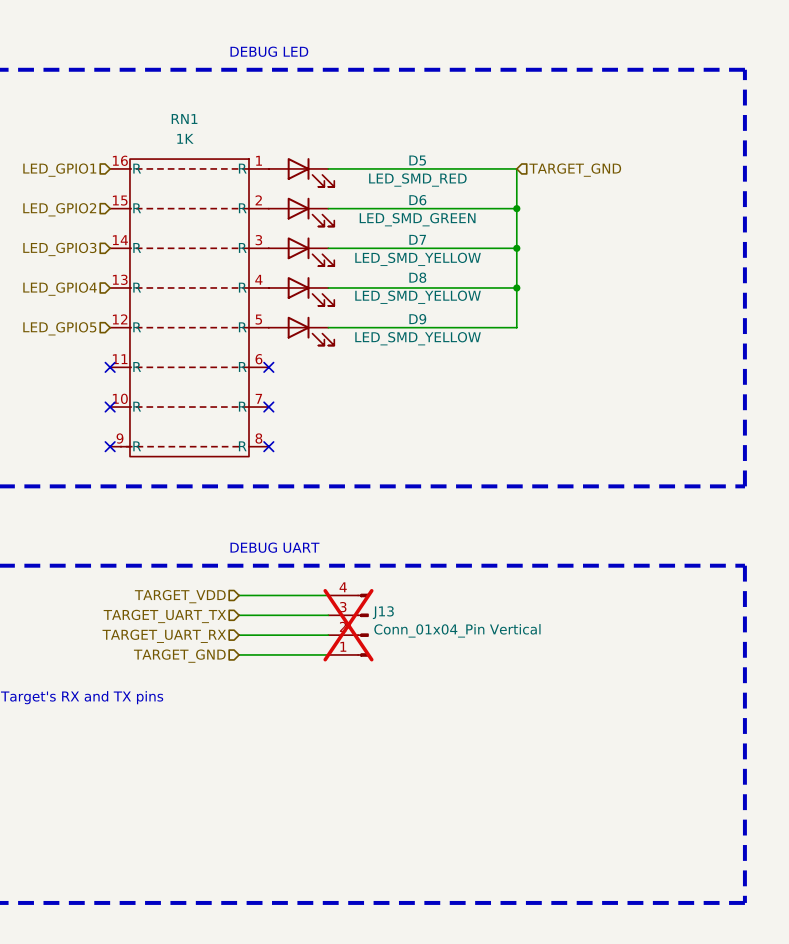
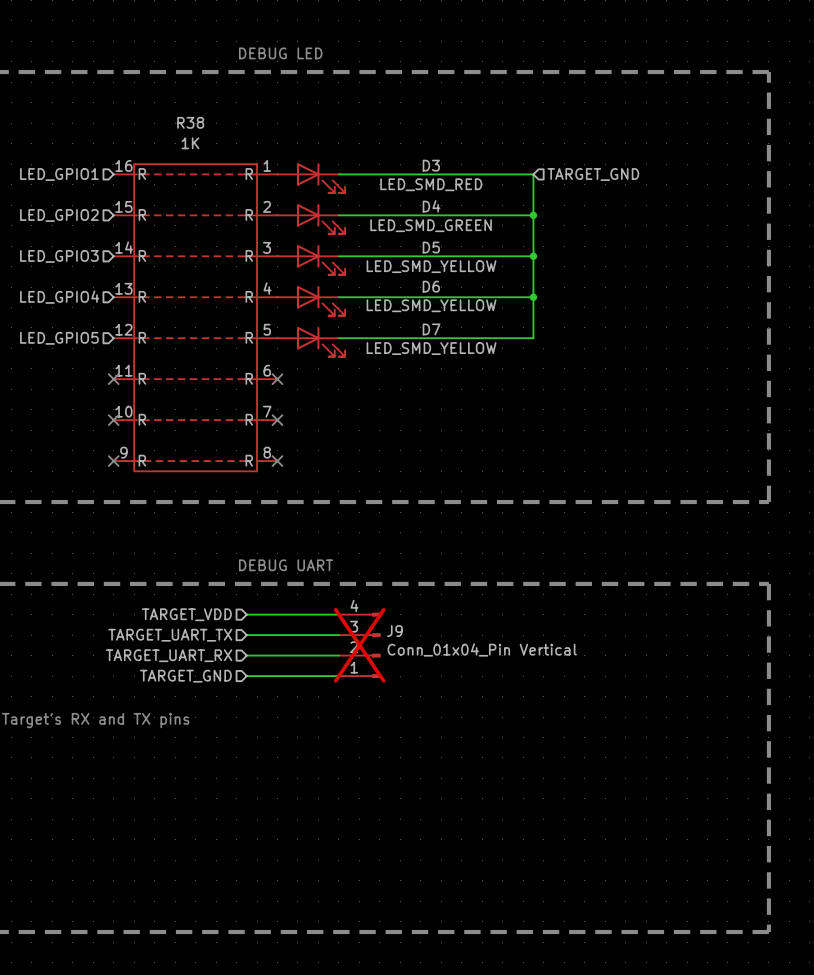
RN1 name: RN1 (184, 119) -> R38 (190, 122)
D5 name: D5 (417, 160) -> D3 (431, 165)
D6 name: D6 (417, 200) -> D4 (431, 206)
D7 name: D7 (417, 239) -> D5 (431, 247)
D8 name: D8 (417, 277) -> D6 (431, 286)
D9 name: D9 (417, 319) -> D7 (431, 329)
J13 name: J13 (383, 612) -> J9 (394, 631)

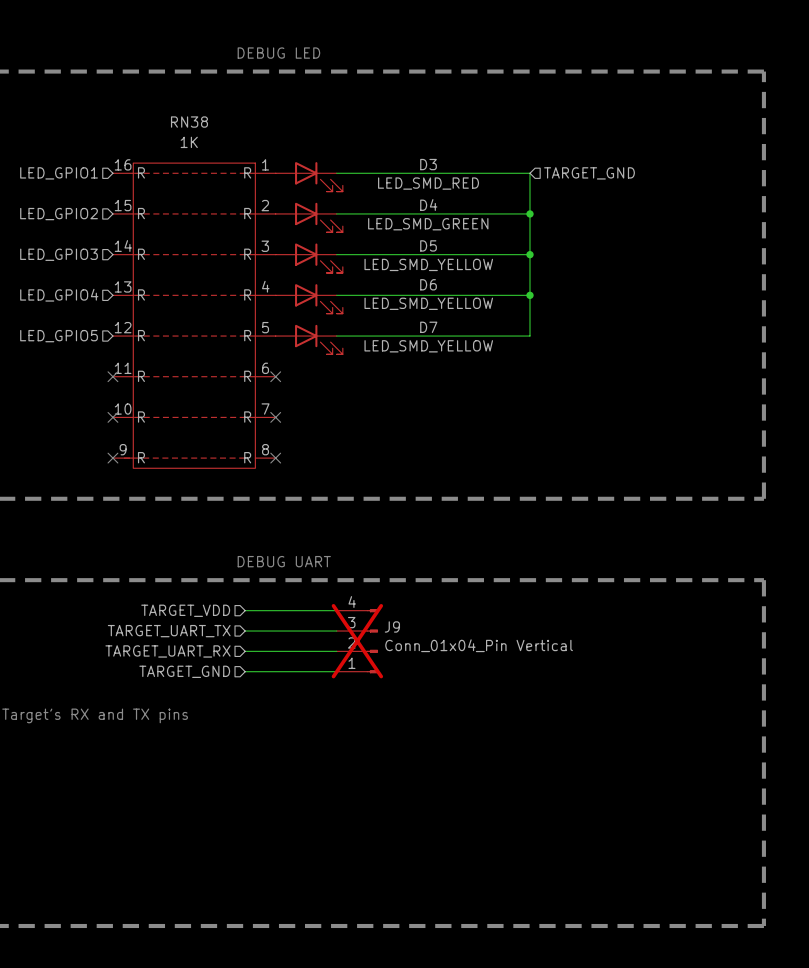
R38 name: R38 (190, 122) -> RN38 (189, 122)

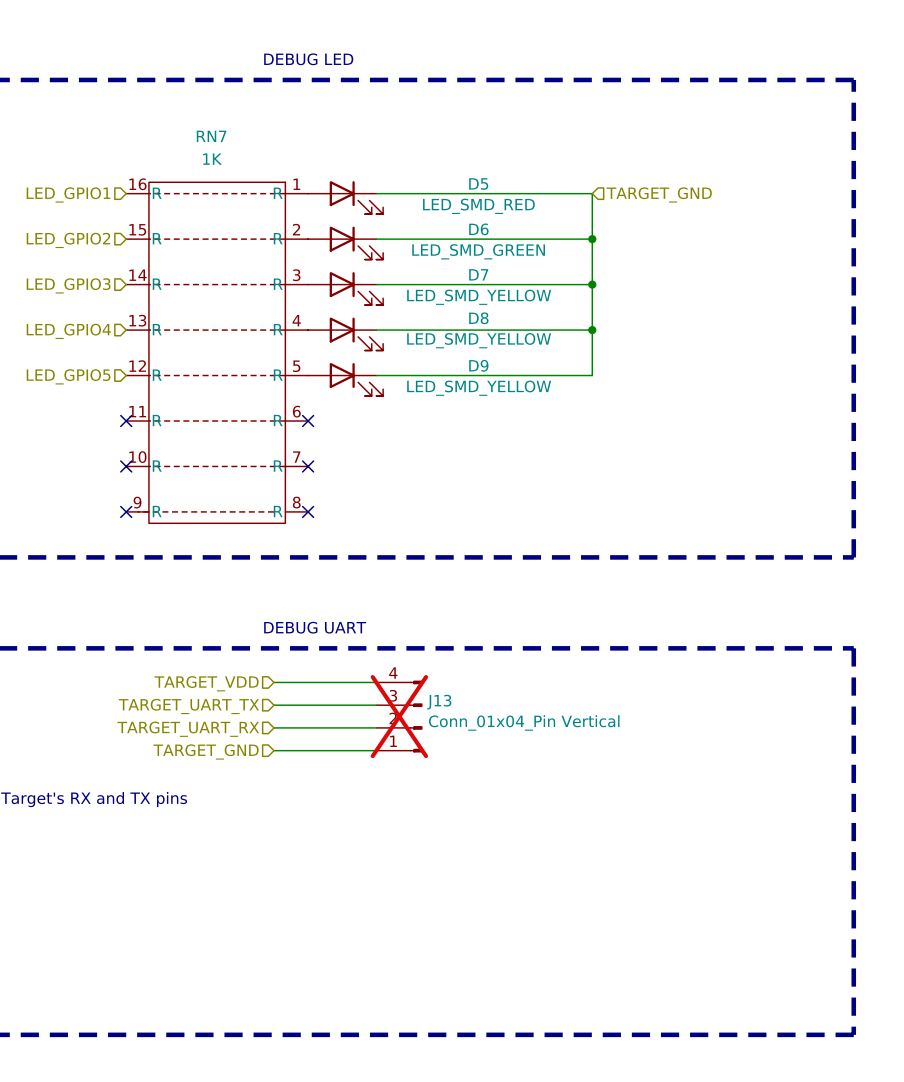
RN38 name: RN38 (189, 122) -> RN7 (211, 136)
D3 name: D3 (428, 164) -> D5 (478, 184)
D4 name: D4 (428, 205) -> D6 (478, 229)
D5 name: D5 (428, 245) -> D7 (478, 274)
D6 name: D6 (428, 284) -> D8 (478, 318)
D7 name: D7 (428, 327) -> D9 (478, 365)
J9 name: J9 (392, 626) -> J13 (439, 702)

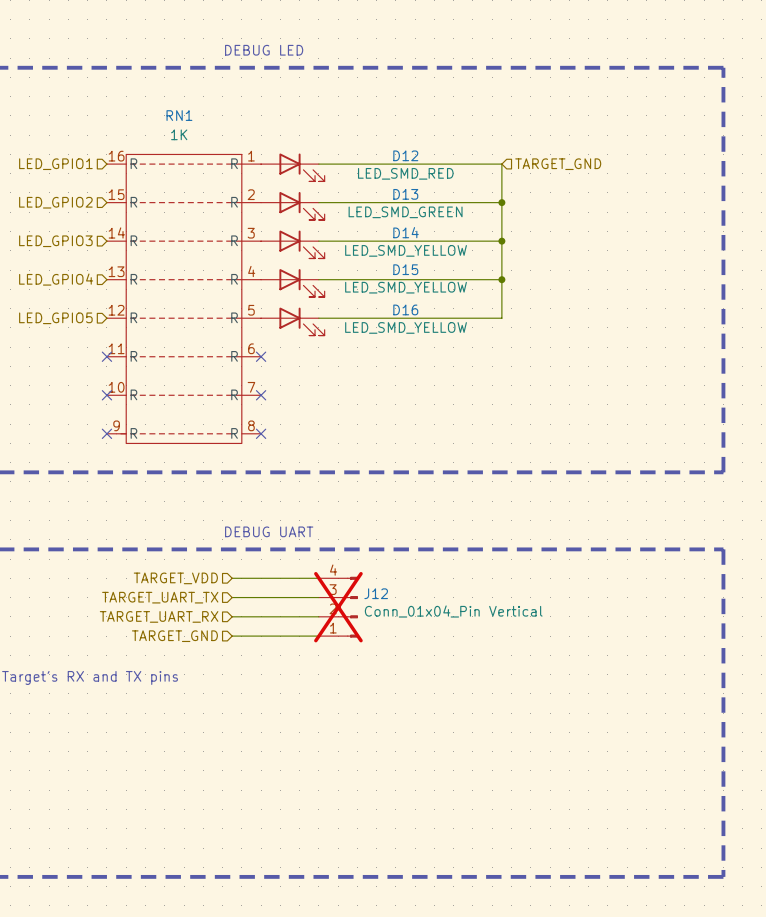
RN7 name: RN7 (211, 136) -> RN1 (179, 115)
D5 name: D5 (478, 184) -> D12 (405, 155)
D6 name: D6 (478, 229) -> D13 (405, 194)
D7 name: D7 (478, 274) -> D14 (406, 232)
D8 name: D8 (478, 318) -> D15 (405, 269)
D9 name: D9 (478, 365) -> D16 (405, 309)
J13 name: J13 (439, 702) -> J12 (376, 593)

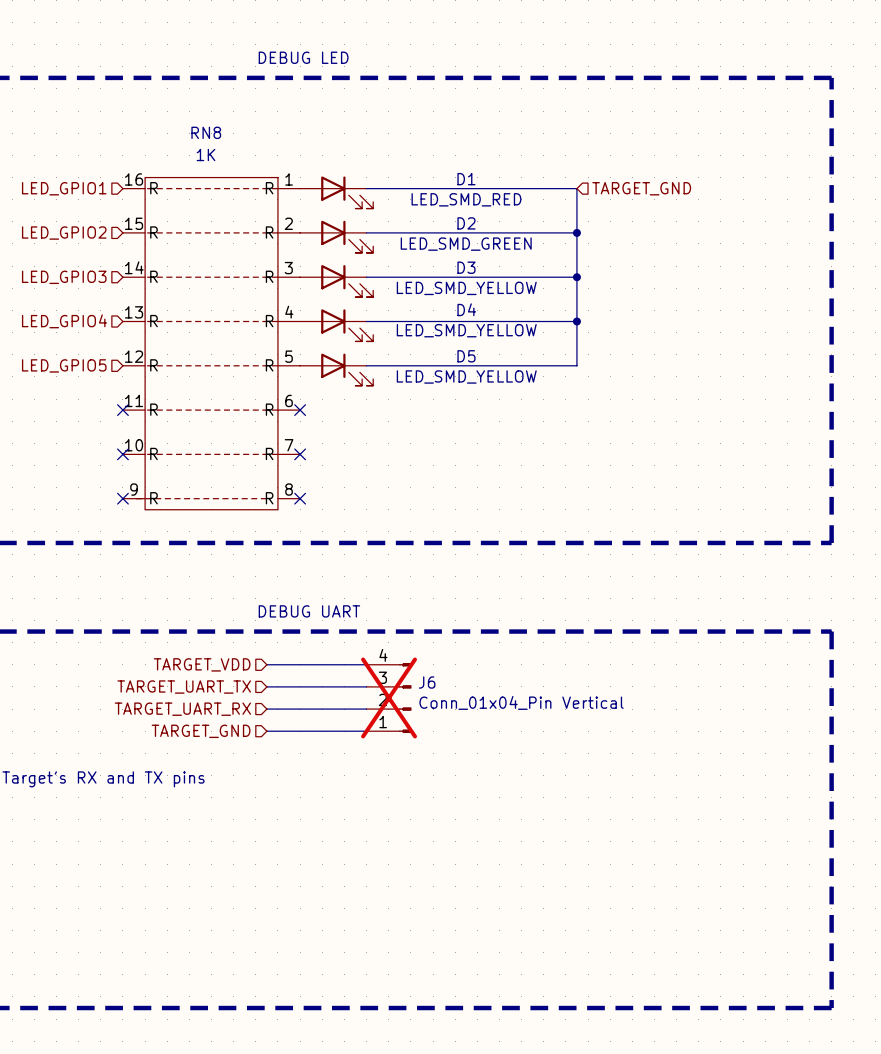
RN1 name: RN1 (179, 115) -> RN8 (206, 132)
D12 name: D12 (405, 155) -> D1 (466, 179)
D13 name: D13 (405, 194) -> D2 (466, 223)
D14 name: D14 (406, 232) -> D3 (466, 267)
D15 name: D15 (405, 269) -> D4 (466, 309)
D16 name: D16 (405, 309) -> D5 (466, 356)
J12 name: J12 (376, 593) -> J6 (427, 682)

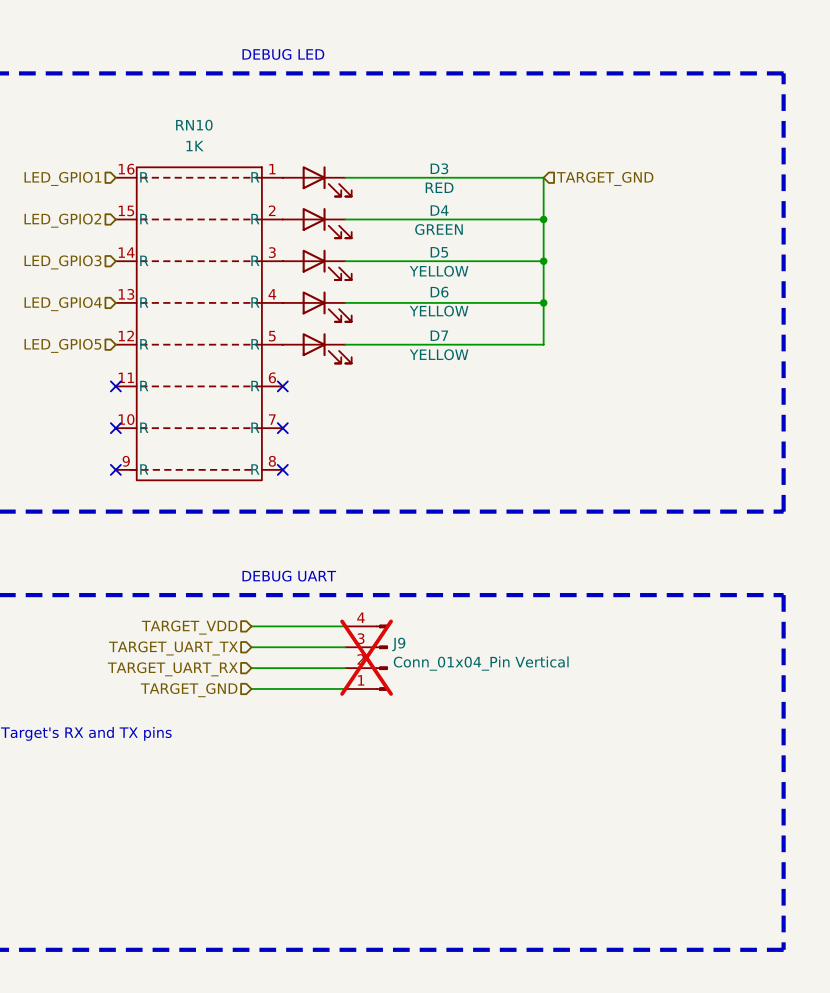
RN8 name: RN8 (206, 132) -> RN10 (194, 125)
D1 name: D1 (466, 179) -> D3 (439, 168)
D1 value: LED_SMD_RED (466, 199) -> RED (439, 187)
D2 name: D2 (466, 223) -> D4 (439, 210)
D2 value: LED_SMD_GREEN (466, 244) -> GREEN (439, 229)
D3 name: D3 (466, 267) -> D5 (439, 252)
D3 value: LED_SMD_YELLOW (466, 288) -> YELLOW (439, 271)
D4 name: D4 (466, 309) -> D6 (439, 292)
D4 value: LED_SMD_YELLOW (466, 330) -> YELLOW (439, 311)
D5 name: D5 (466, 356) -> D7 (439, 335)
D5 value: LED_SMD_YELLOW (466, 376) -> YELLOW (439, 354)
J6 name: J6 (427, 682) -> J9 (398, 644)

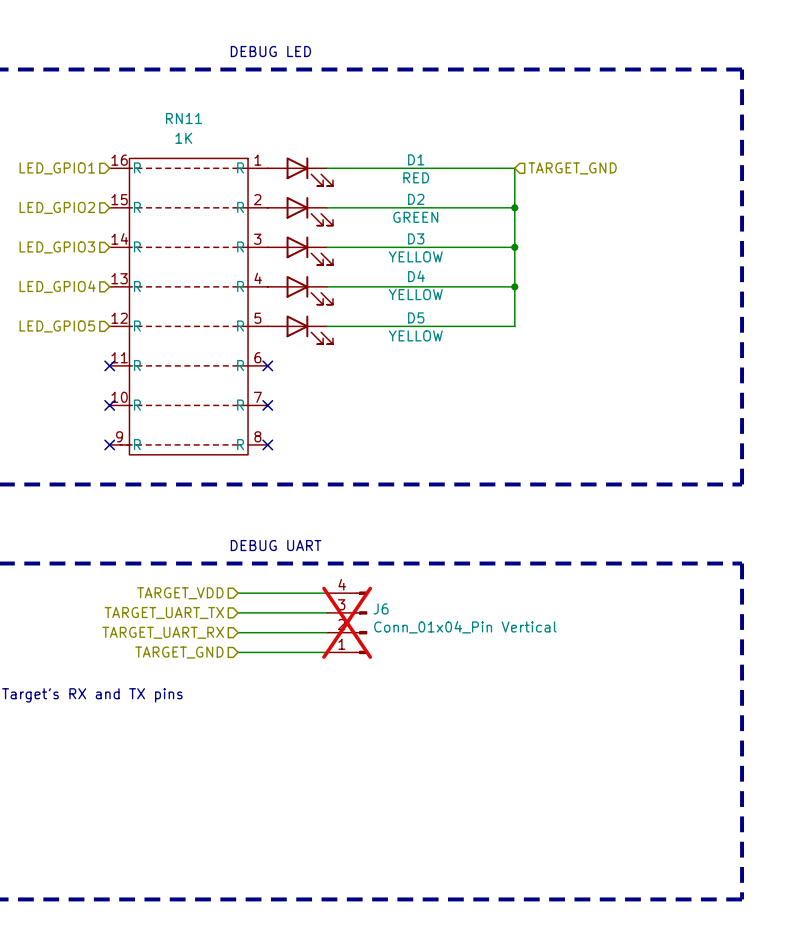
RN10 name: RN10 (194, 125) -> RN11 (184, 118)
D3 name: D3 (439, 168) -> D1 (416, 159)
D4 name: D4 (439, 210) -> D2 (416, 199)
D5 name: D5 (439, 252) -> D3 (416, 238)
D6 name: D6 (439, 292) -> D4 (416, 276)
D7 name: D7 (439, 335) -> D5 (416, 317)
J9 name: J9 (398, 644) -> J6 (381, 608)

